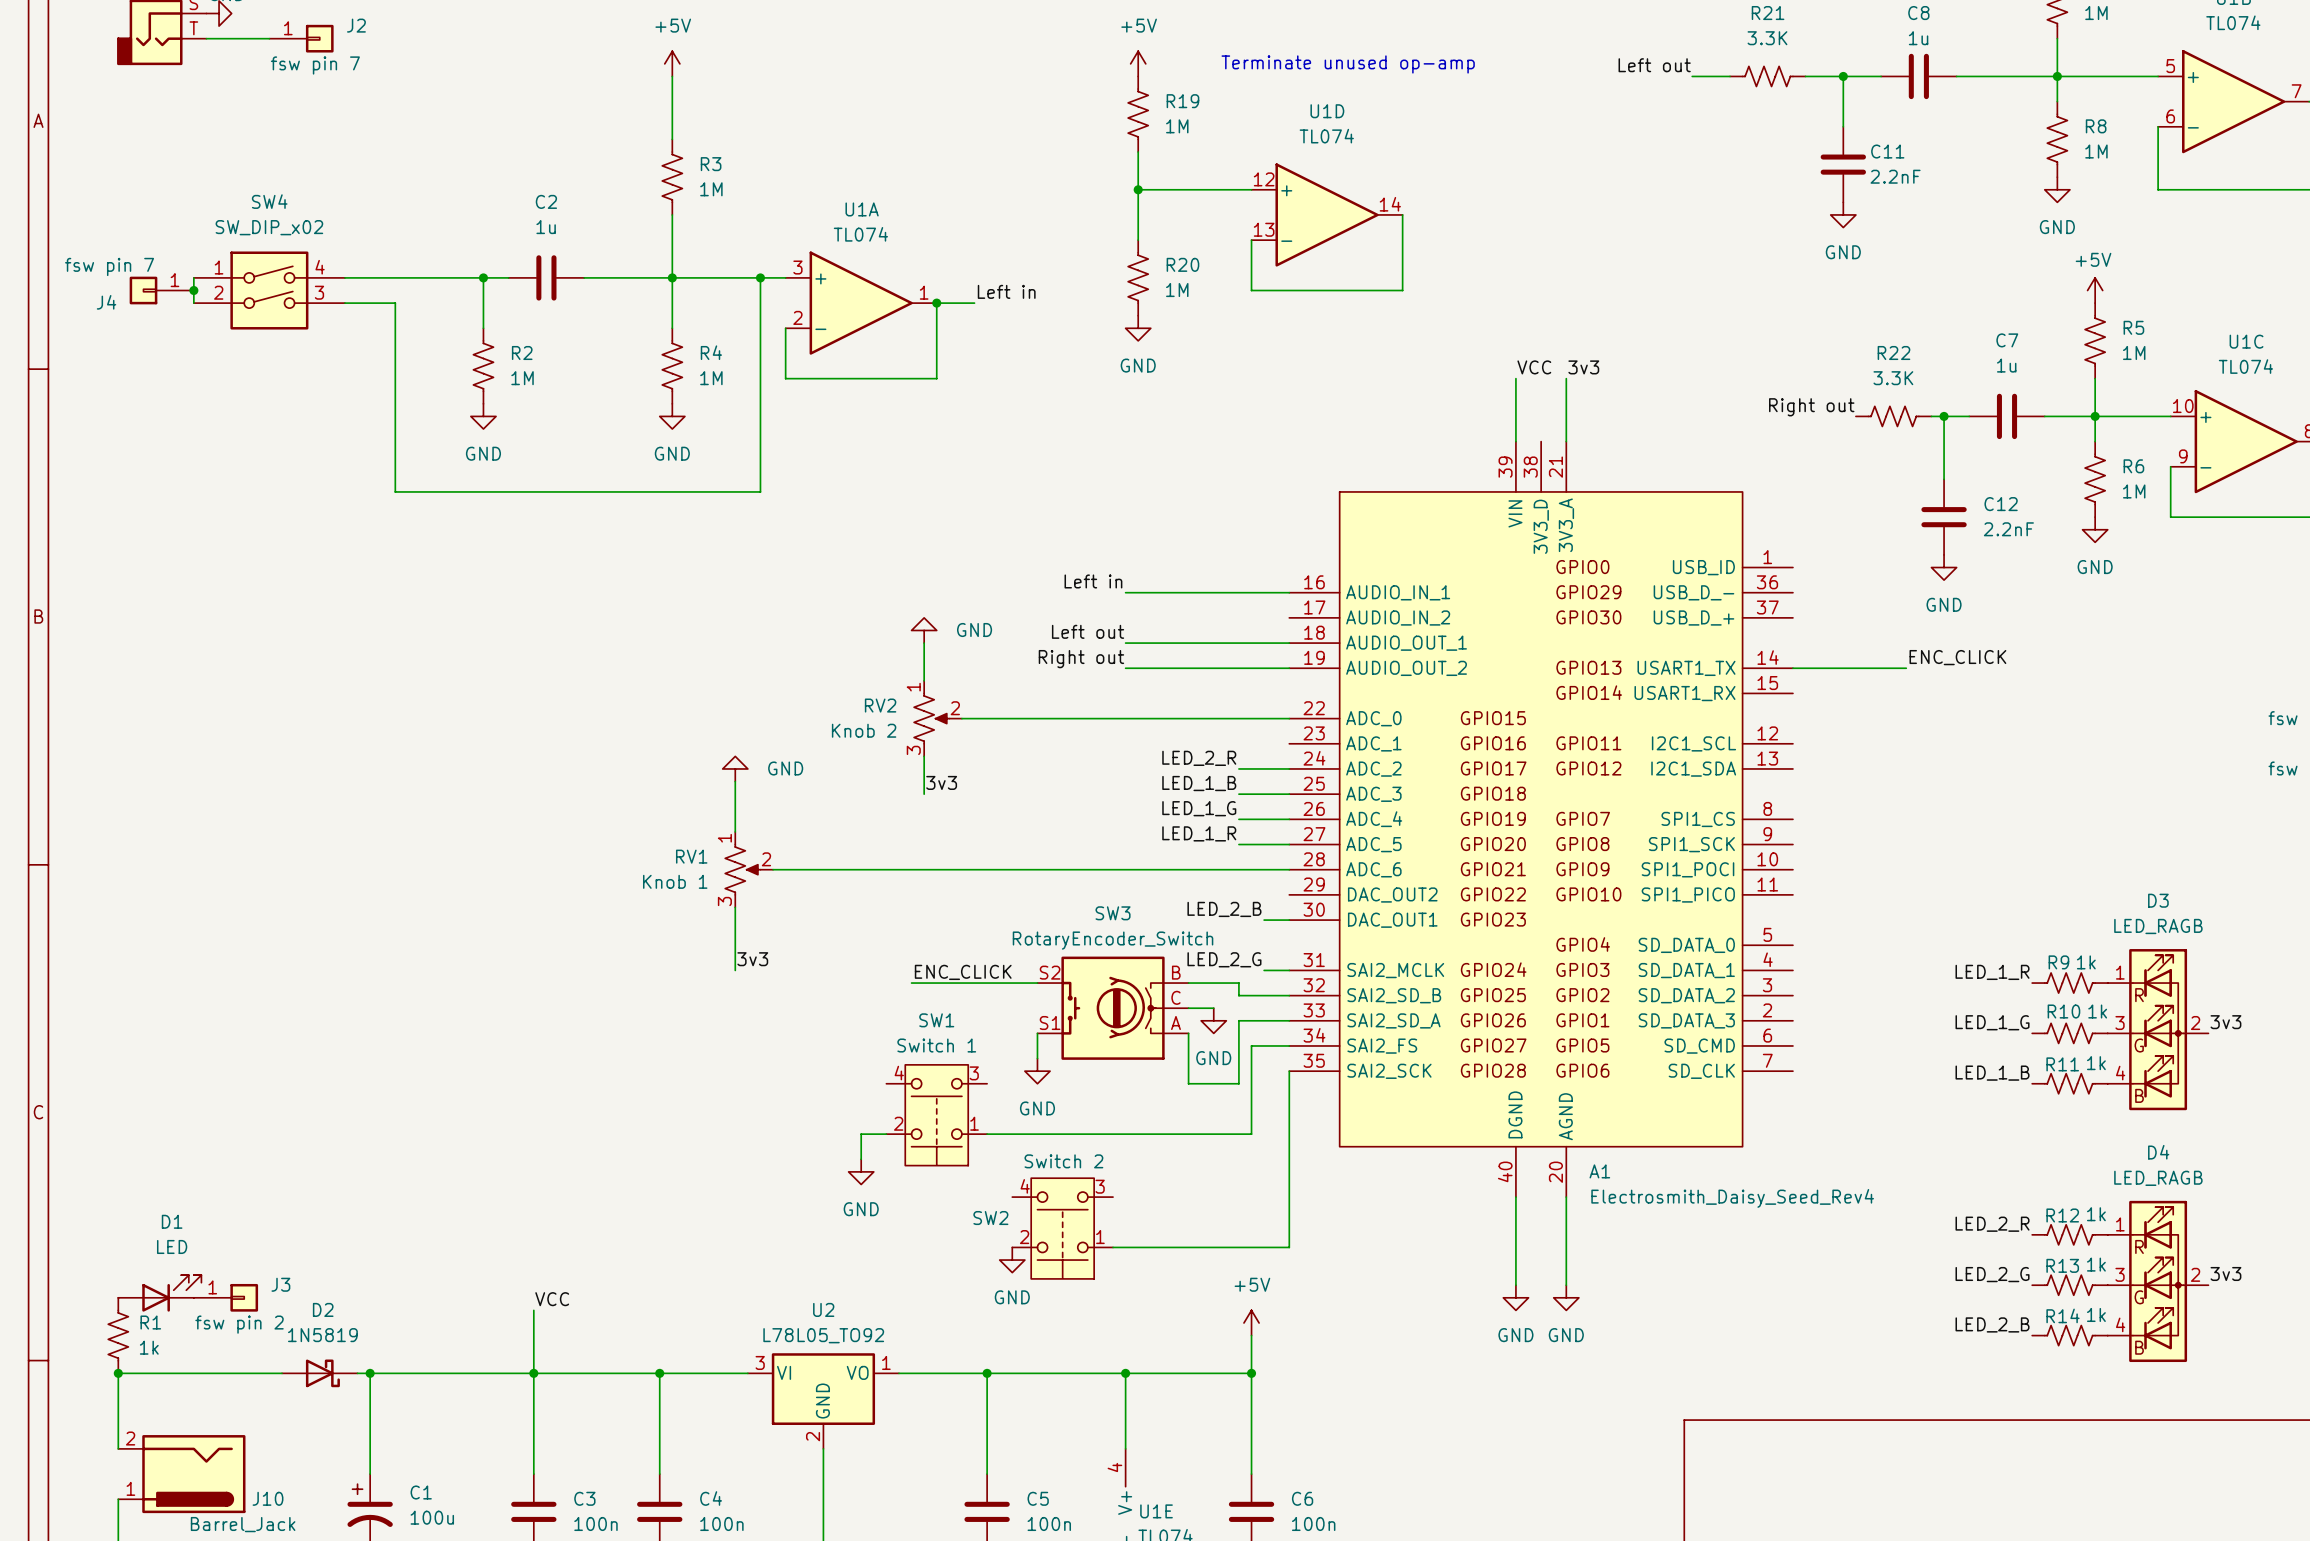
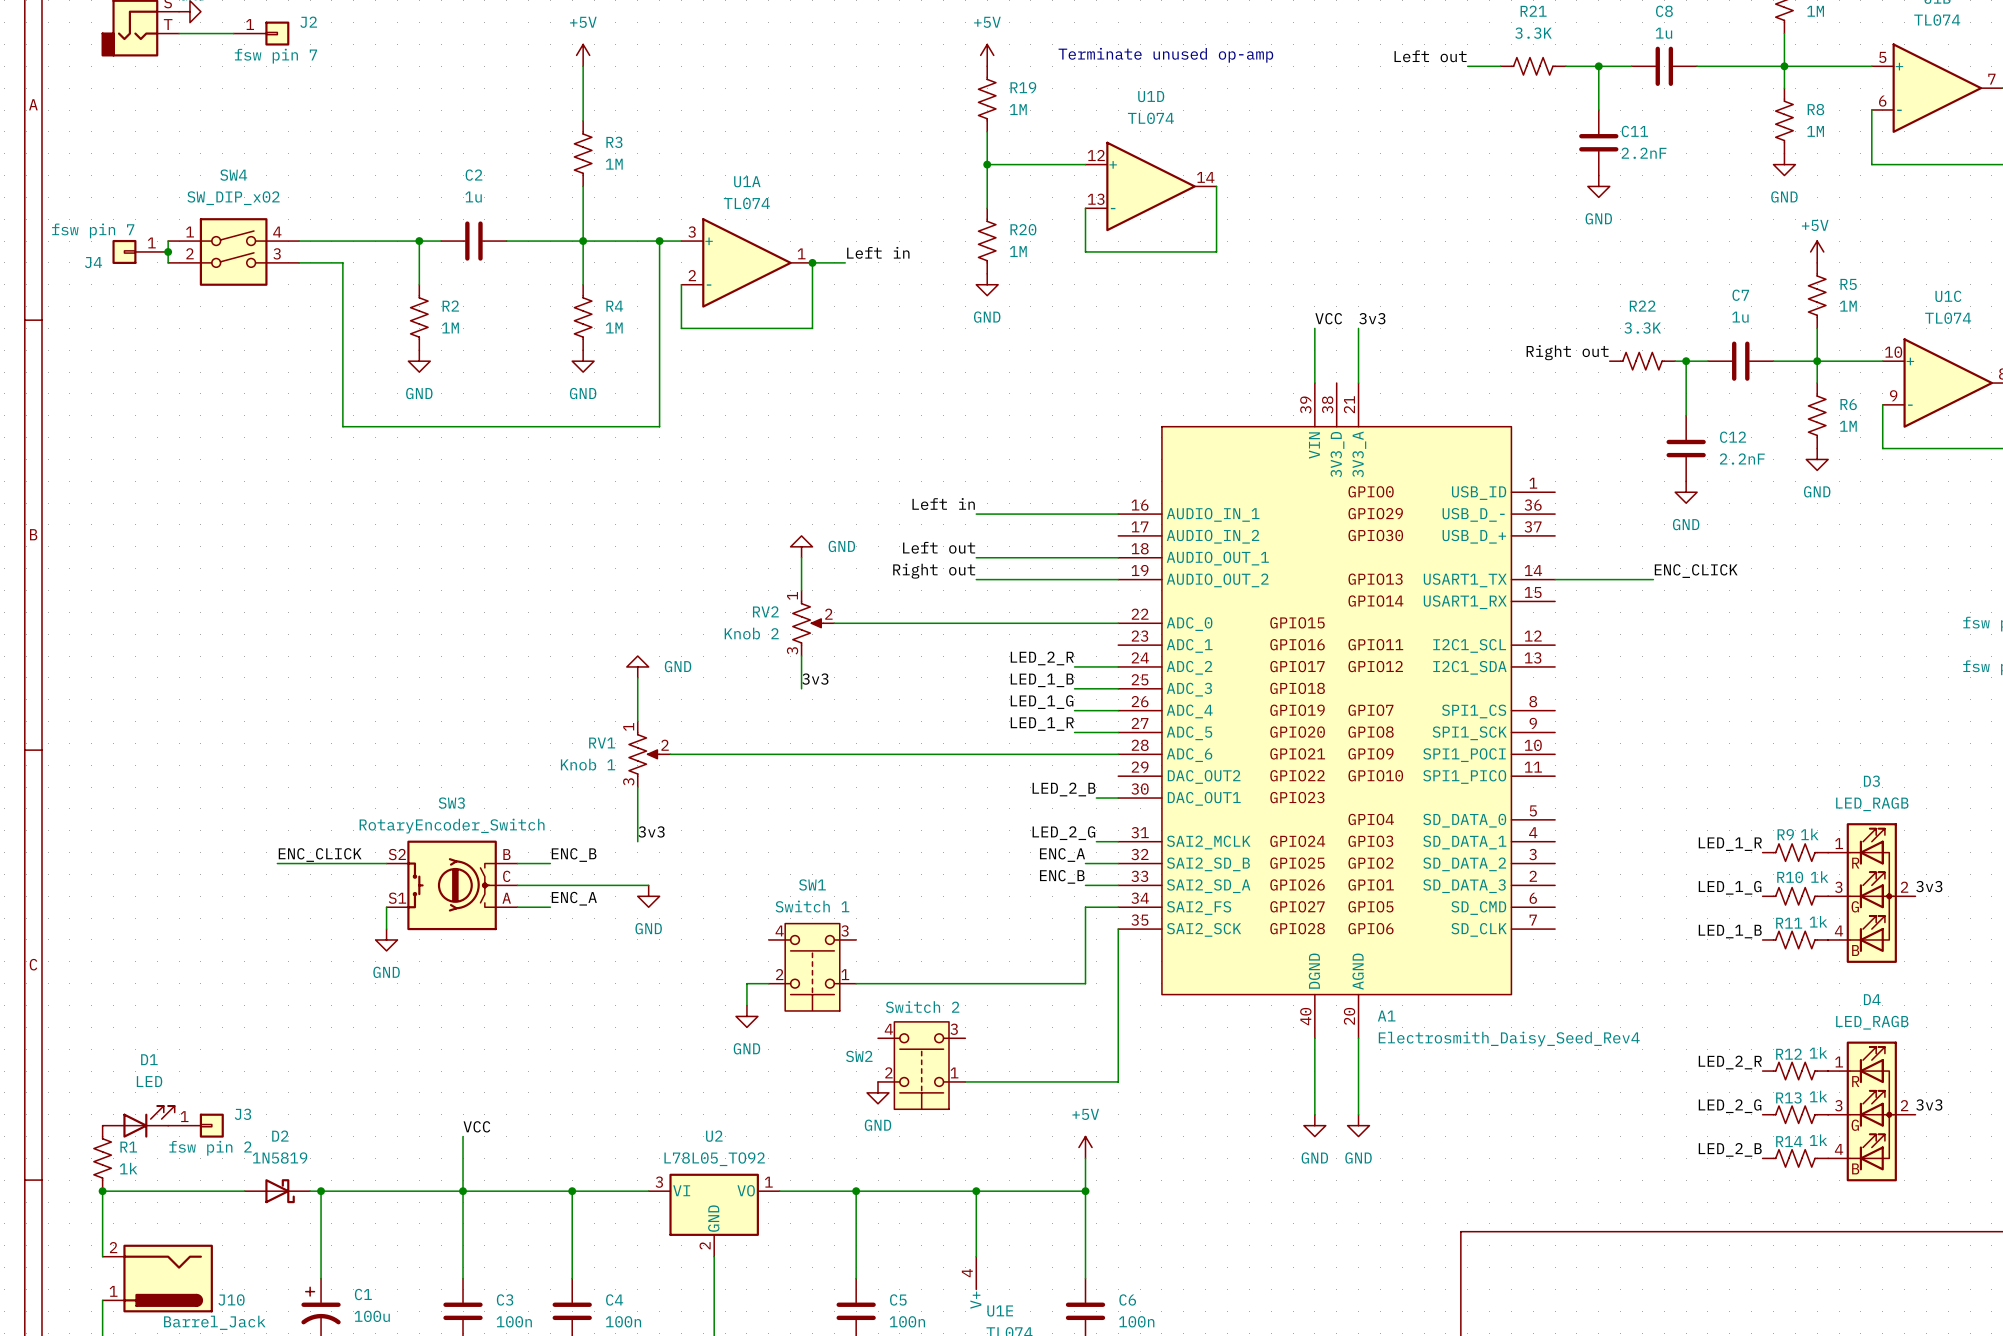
label: ENC_CLICK (963, 972) -> none
wire: (911, 983) (1037, 983) -> none
wire: (1188, 983) (1238, 983) (1238, 995) (1251, 995) -> none
label: none -> ENC_CLICK (320, 855)
label: none -> ENC_B (574, 855)
label: none -> ENC_A (1062, 855)
wire: none -> (277, 863) (386, 863)
wire: none -> (517, 863) (550, 863)
SW3 position: (1113, 1008) -> (452, 885)
wire: (1188, 1008) (1213, 1008) -> none
label: none -> ENC_B (1062, 876)
wire: none -> (517, 885) (648, 885)
power symbol: GND (1213, 1020) -> none
wire: (1251, 1020) (1238, 1020) (1238, 1083) (1188, 1083) (1188, 1033) -> none
power symbol: none -> GND (648, 896)
wire: (1037, 1033) (1037, 1058) -> none
label: none -> ENC_A (574, 898)
wire: none -> (386, 907) (386, 929)
wire: none -> (517, 907) (550, 907)
power symbol: GND (1037, 1071) -> none
power symbol: none -> GND (386, 939)

